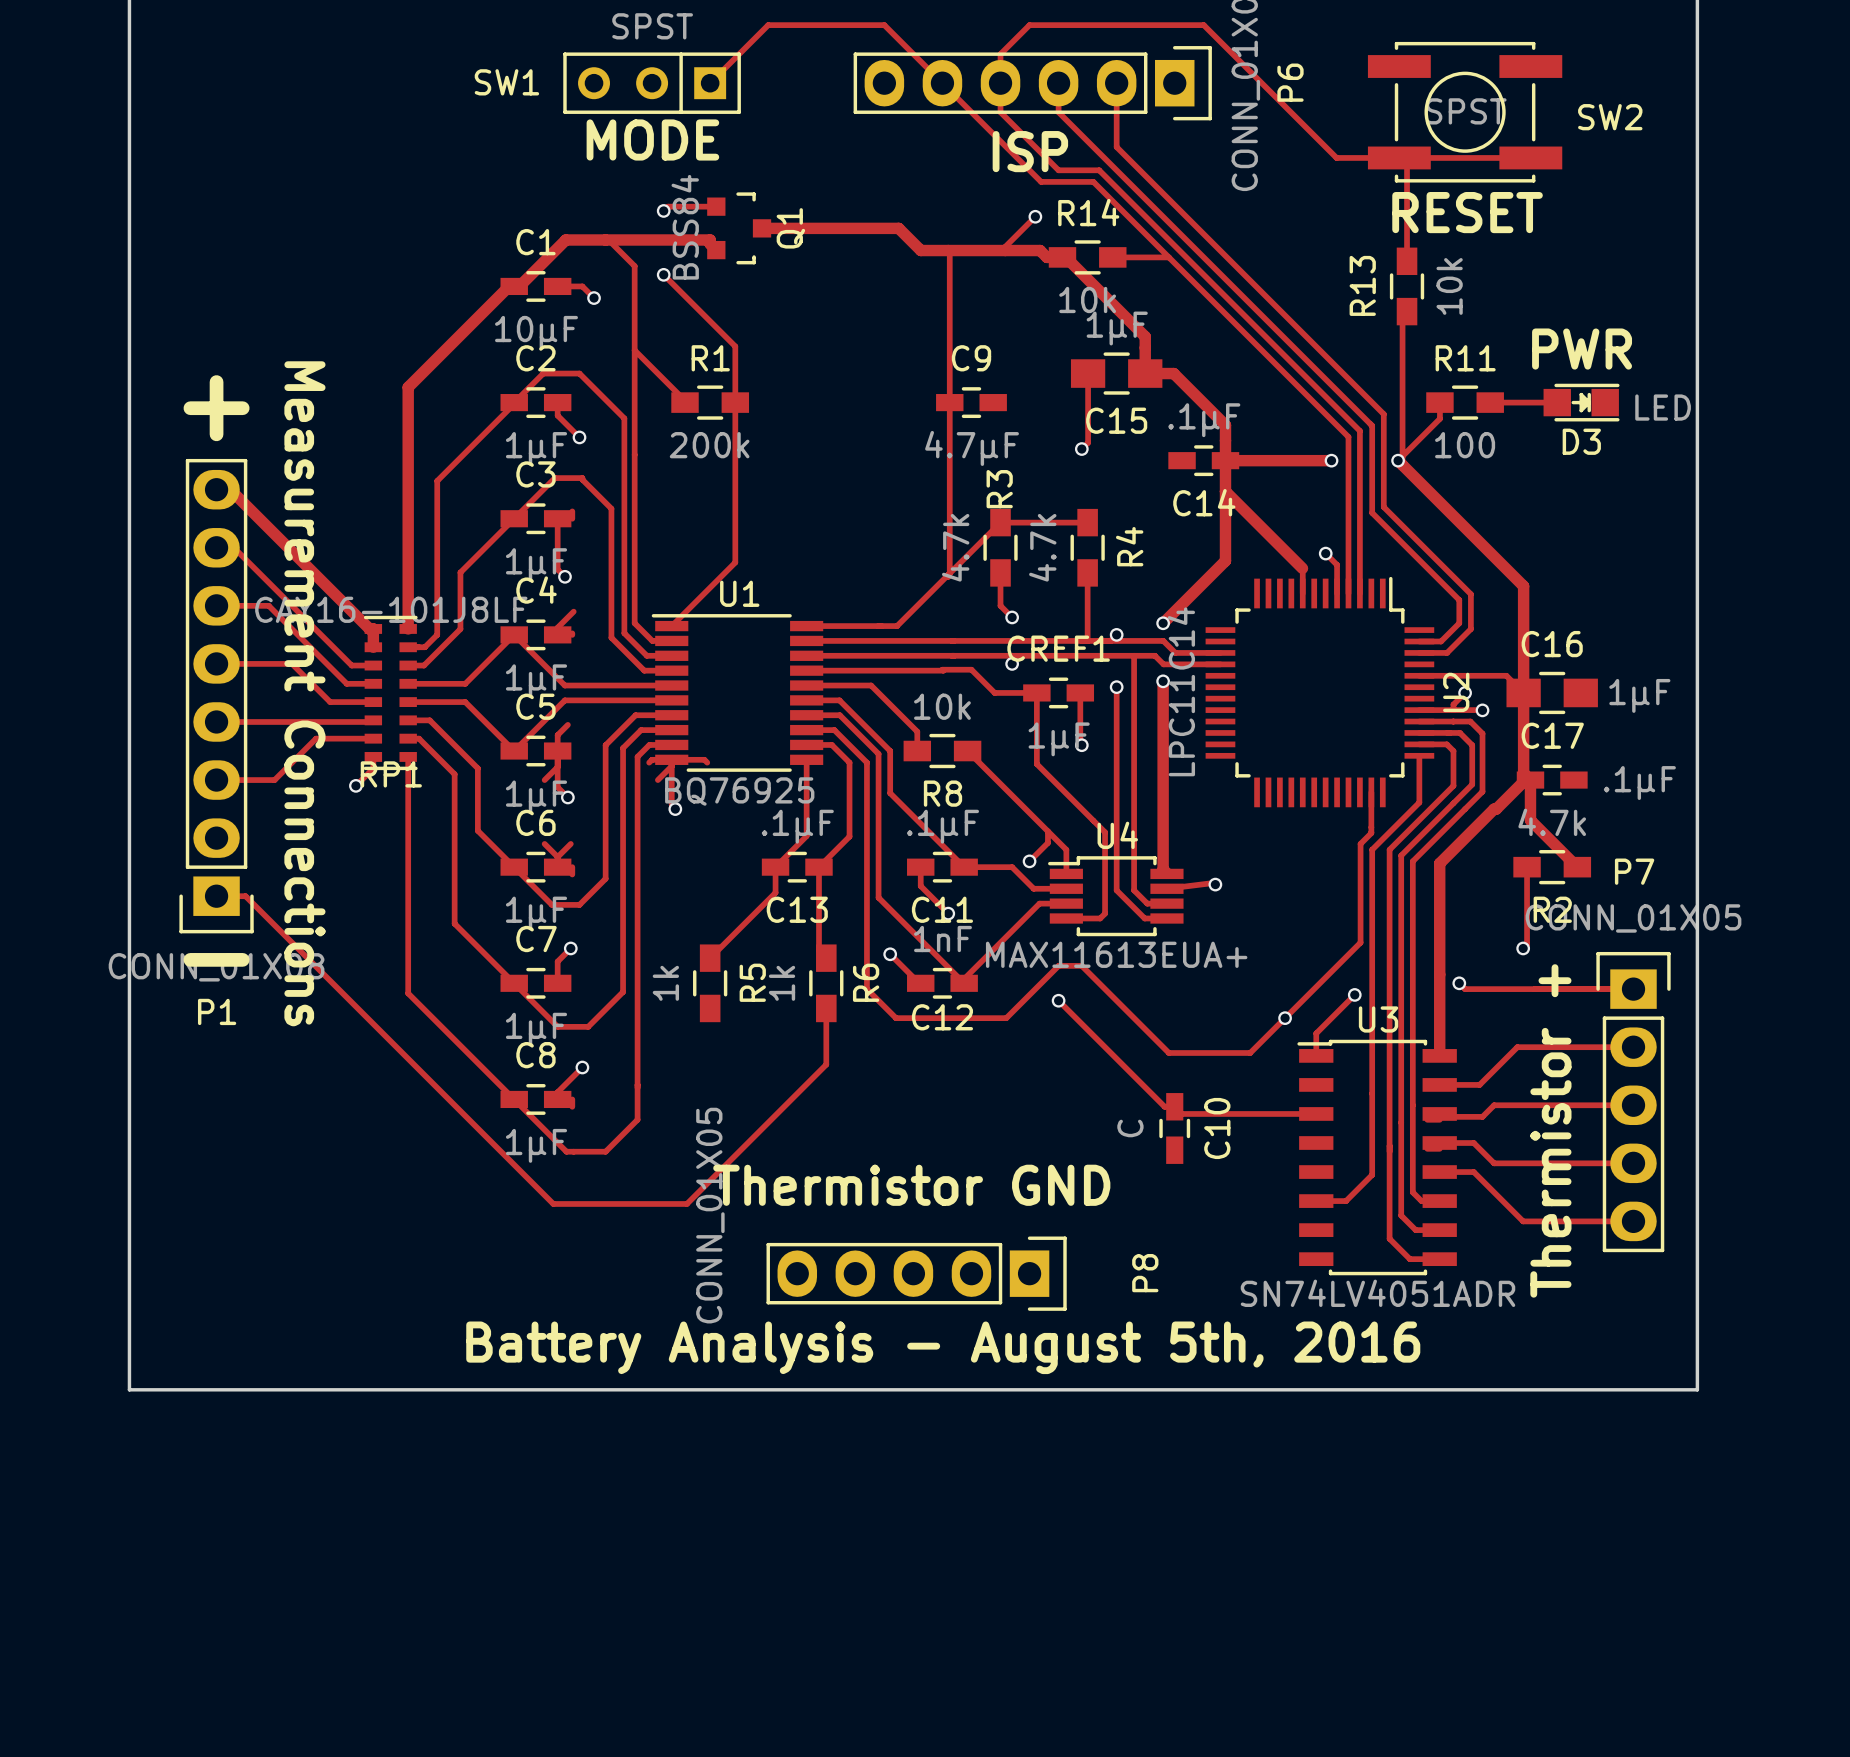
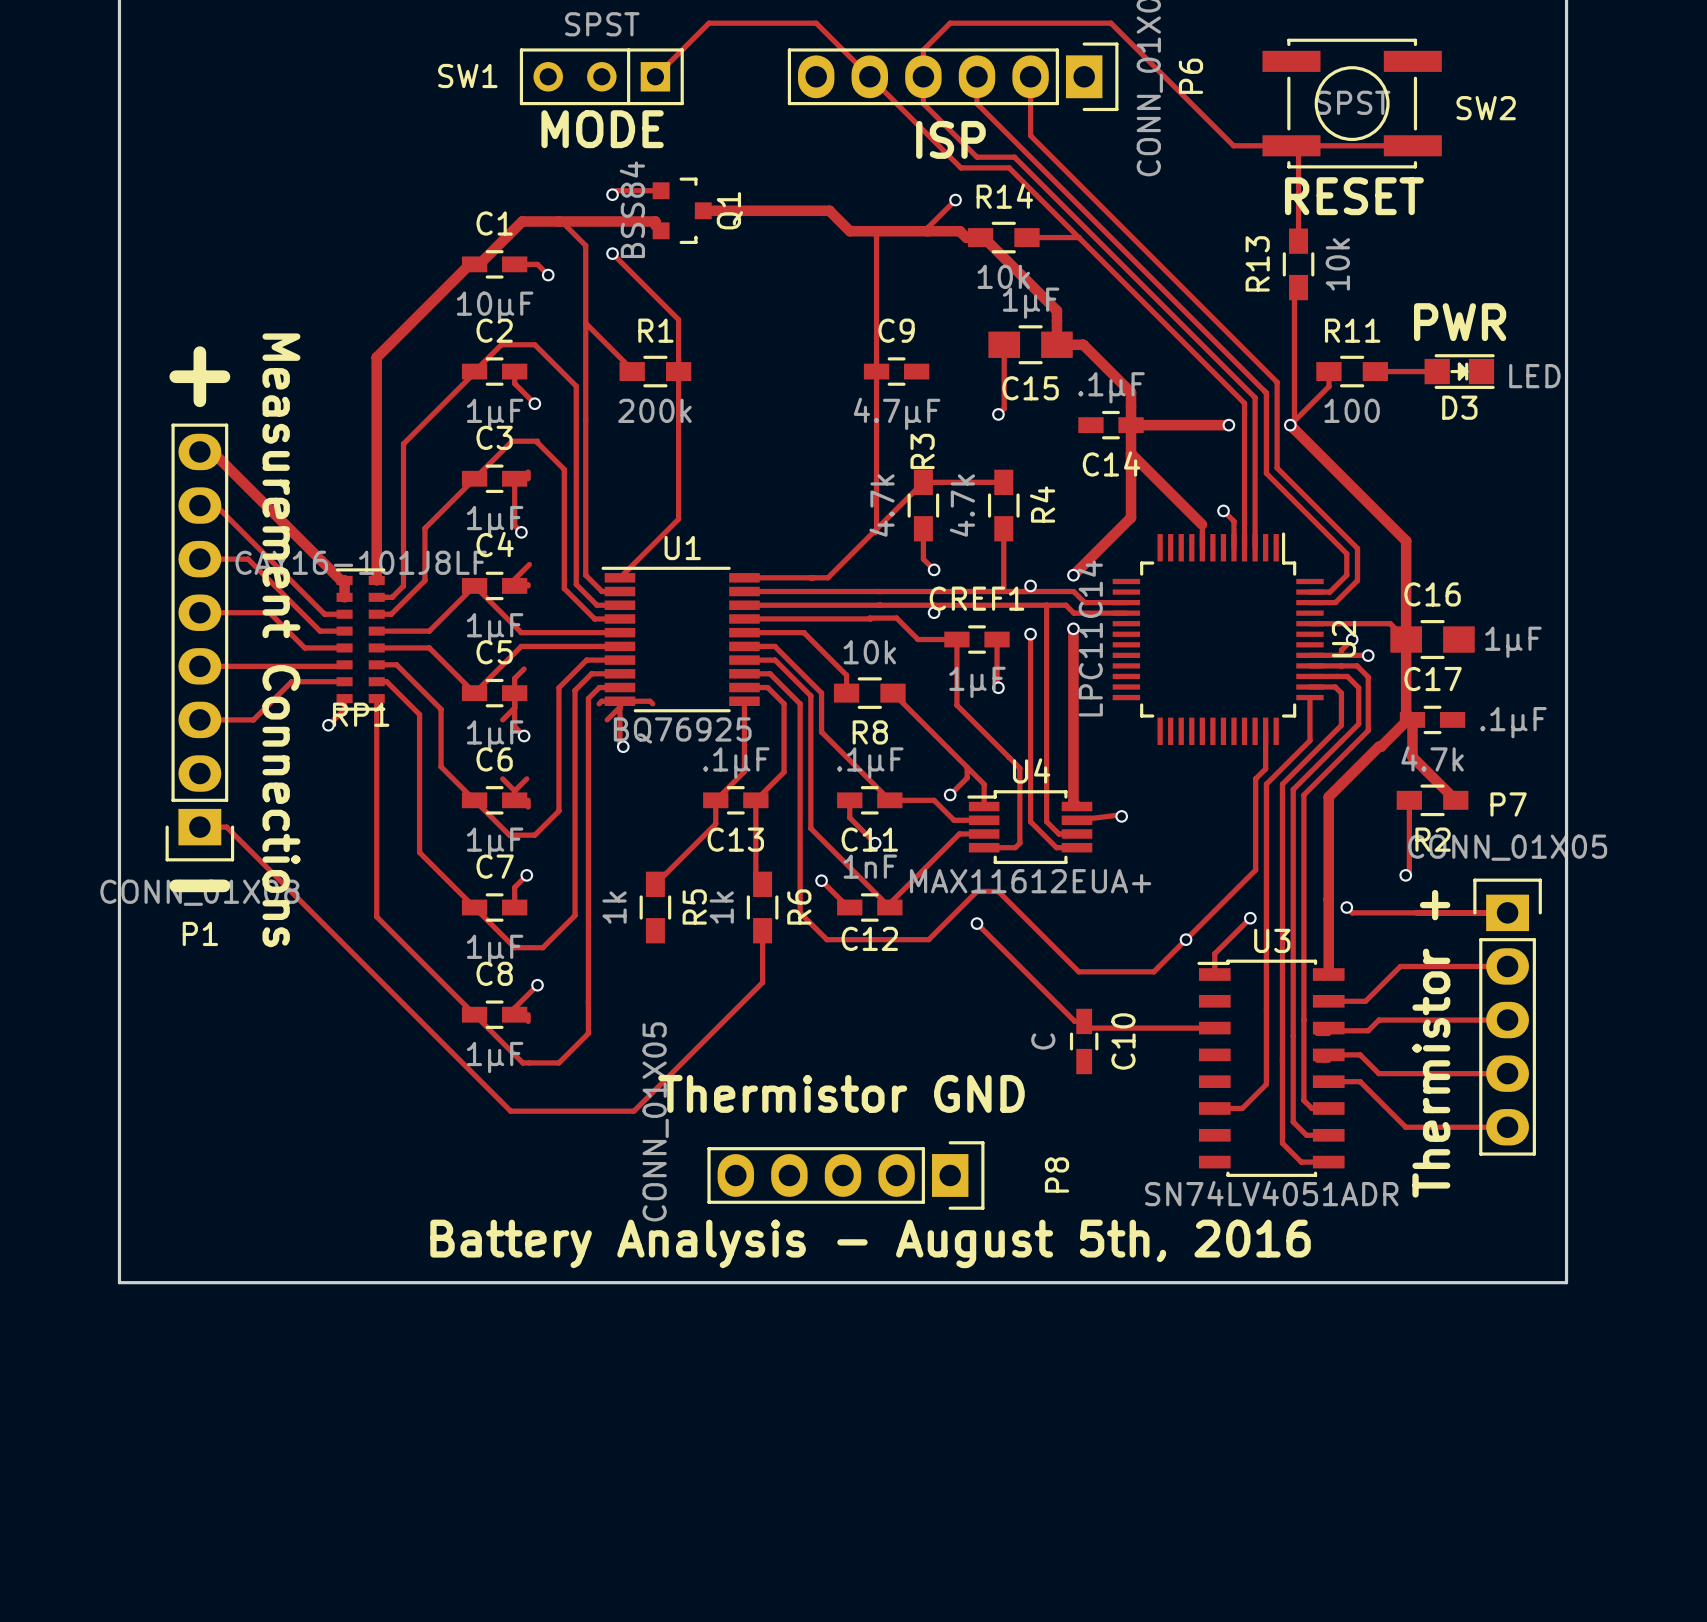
U4 value: MAX11613EUA+ (1116, 954) -> MAX11612EUA+ (1030, 881)

